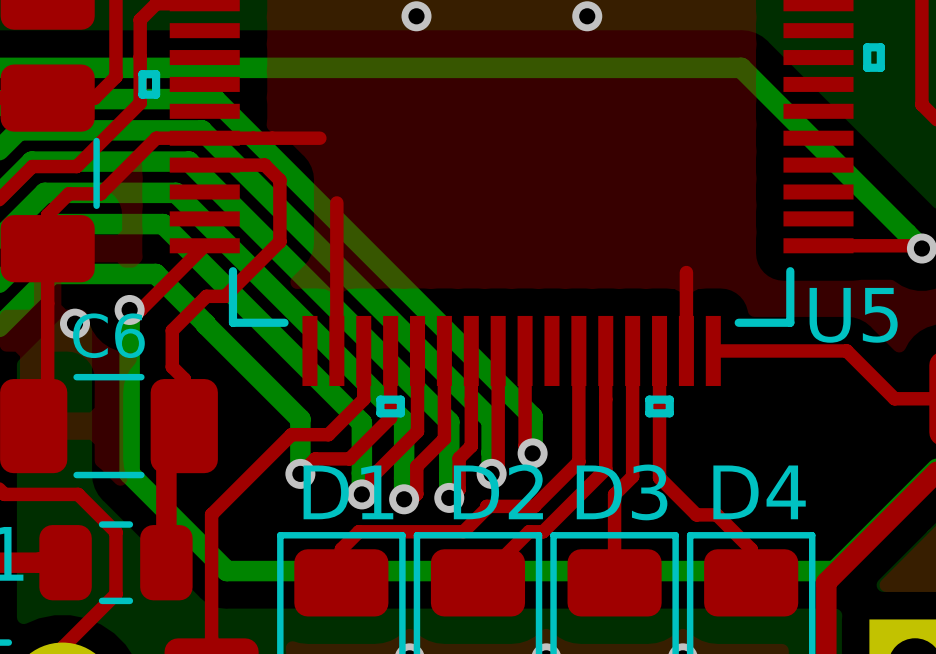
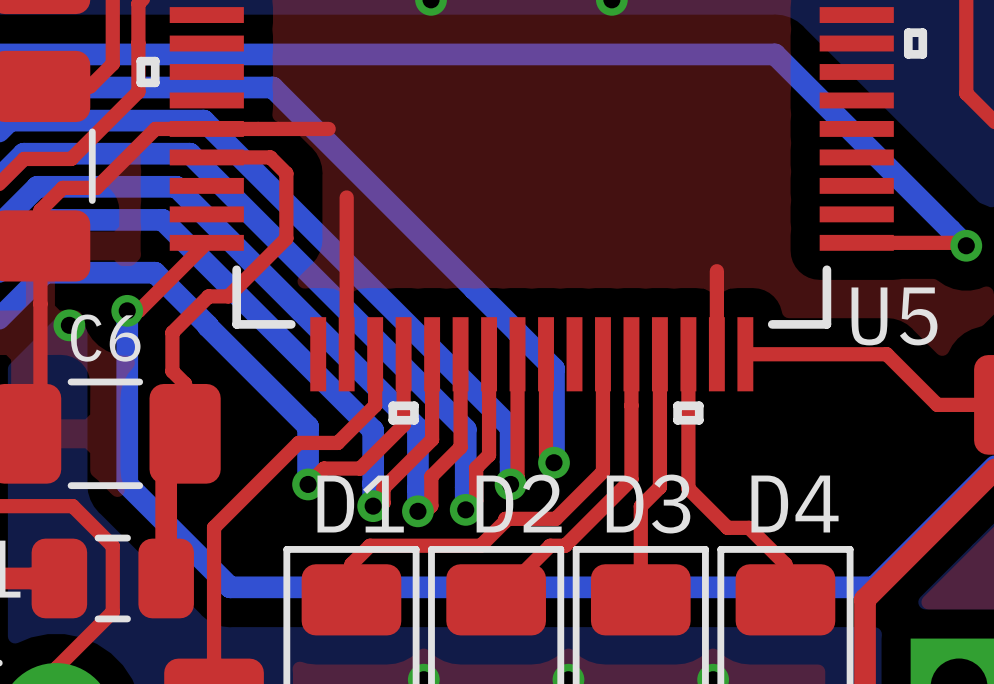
bottom track: (214, 99) (532, 416) -> (217, 87) (272, 87) (554, 368) (554, 424)

